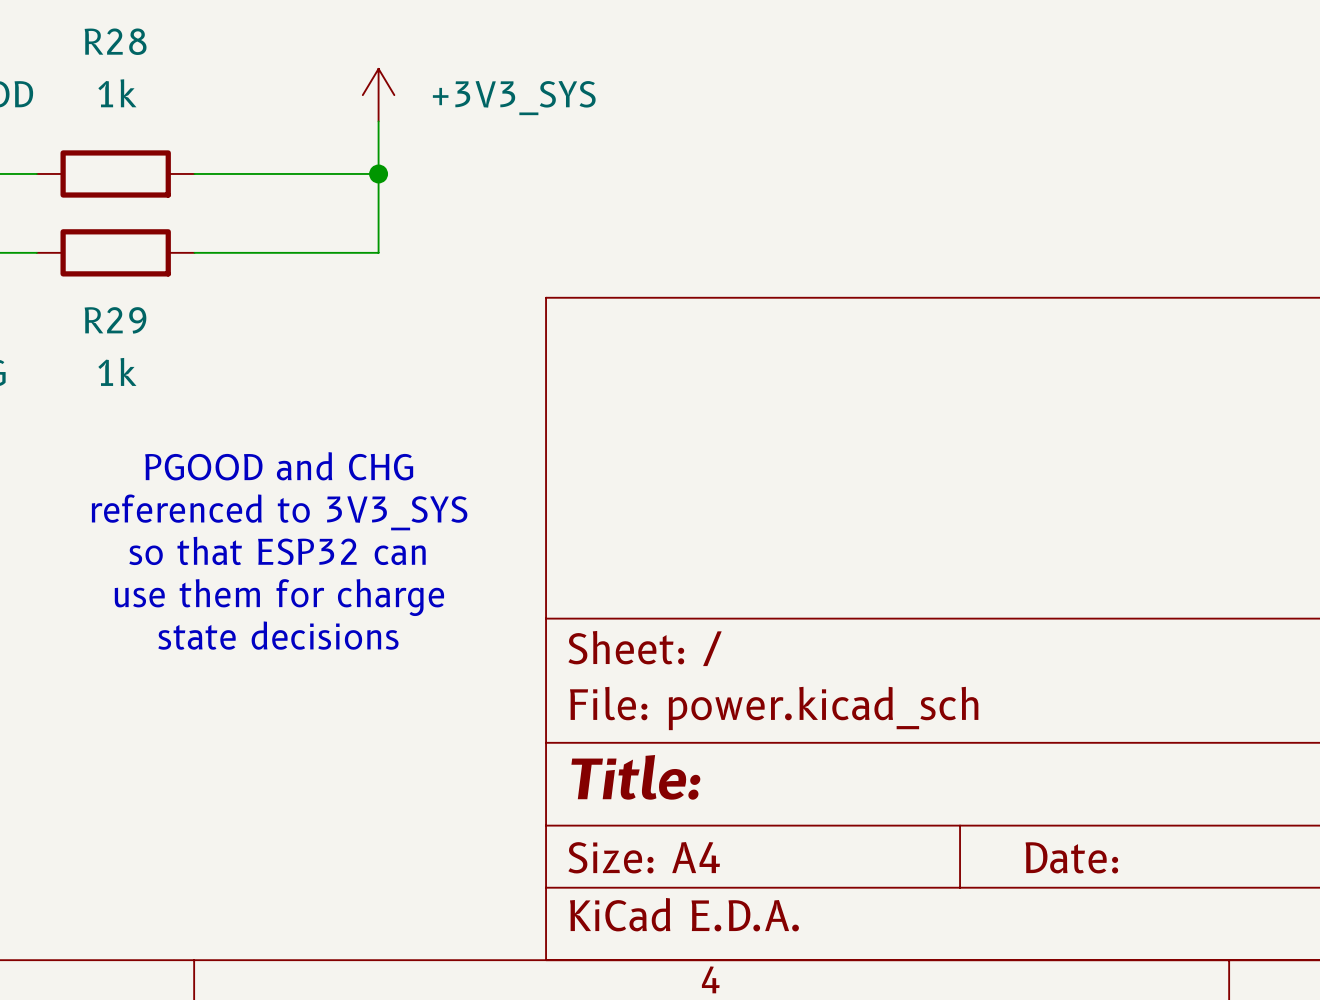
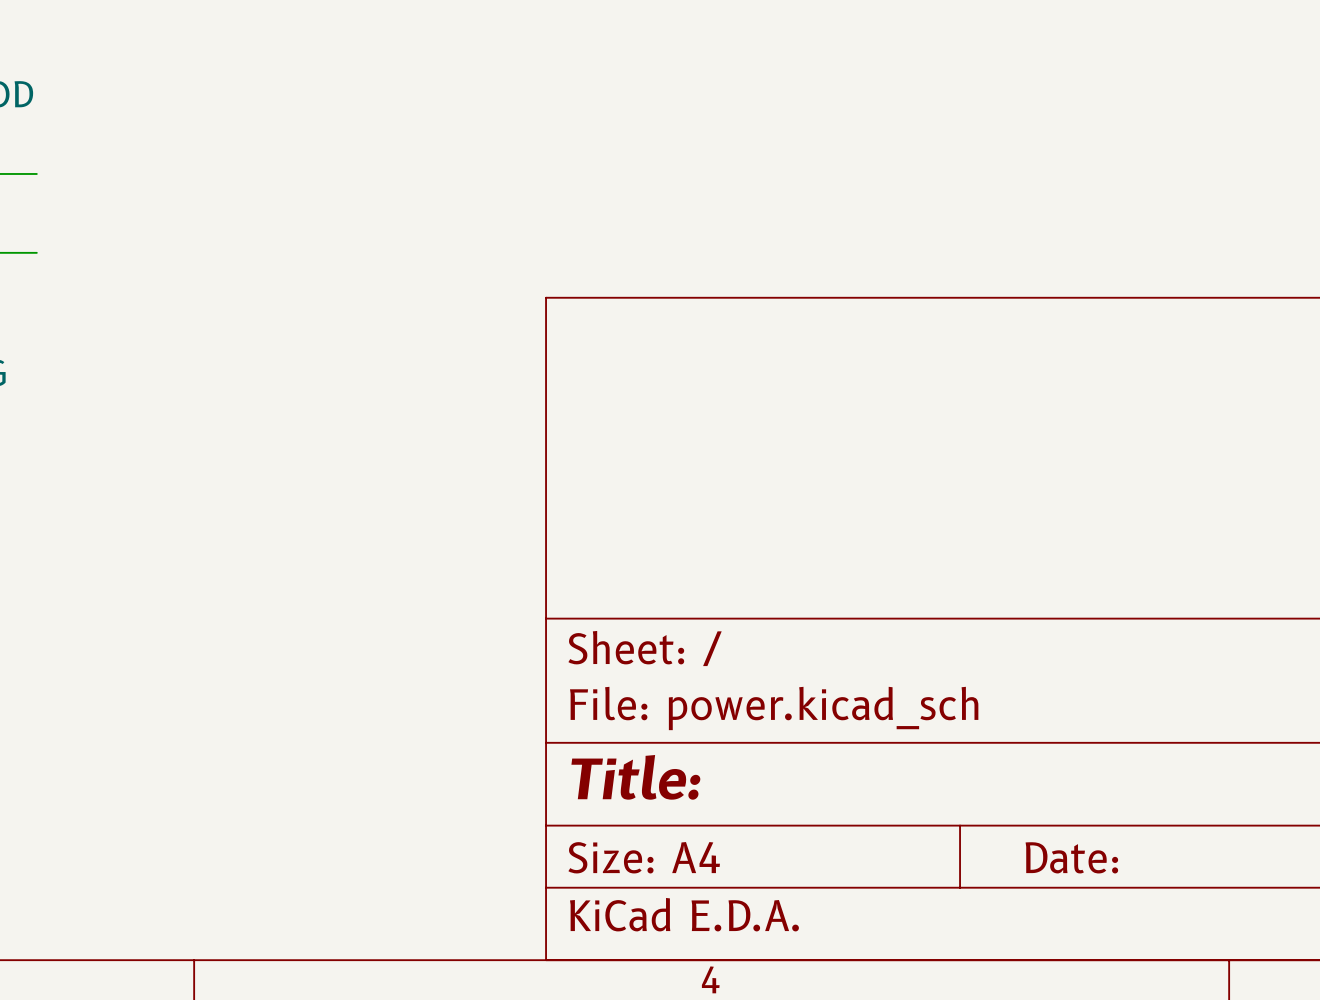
power symbol: +3V3_SYS (378, 95) -> none
wire: (378, 121) (378, 252) (194, 252) -> none
R28: 1k (115, 173) -> none
wire: (194, 173) (378, 173) -> none
junction: (378, 173) -> none
R29: 1k (115, 252) -> none
text: PGOOD and CHG (279, 466) -> none
text: referenced to 3V3_SYS (279, 512) -> none
text: so that ESP32 can (277, 550) -> none
text: use them for charge (279, 597) -> none
text: state decisions (278, 635) -> none

